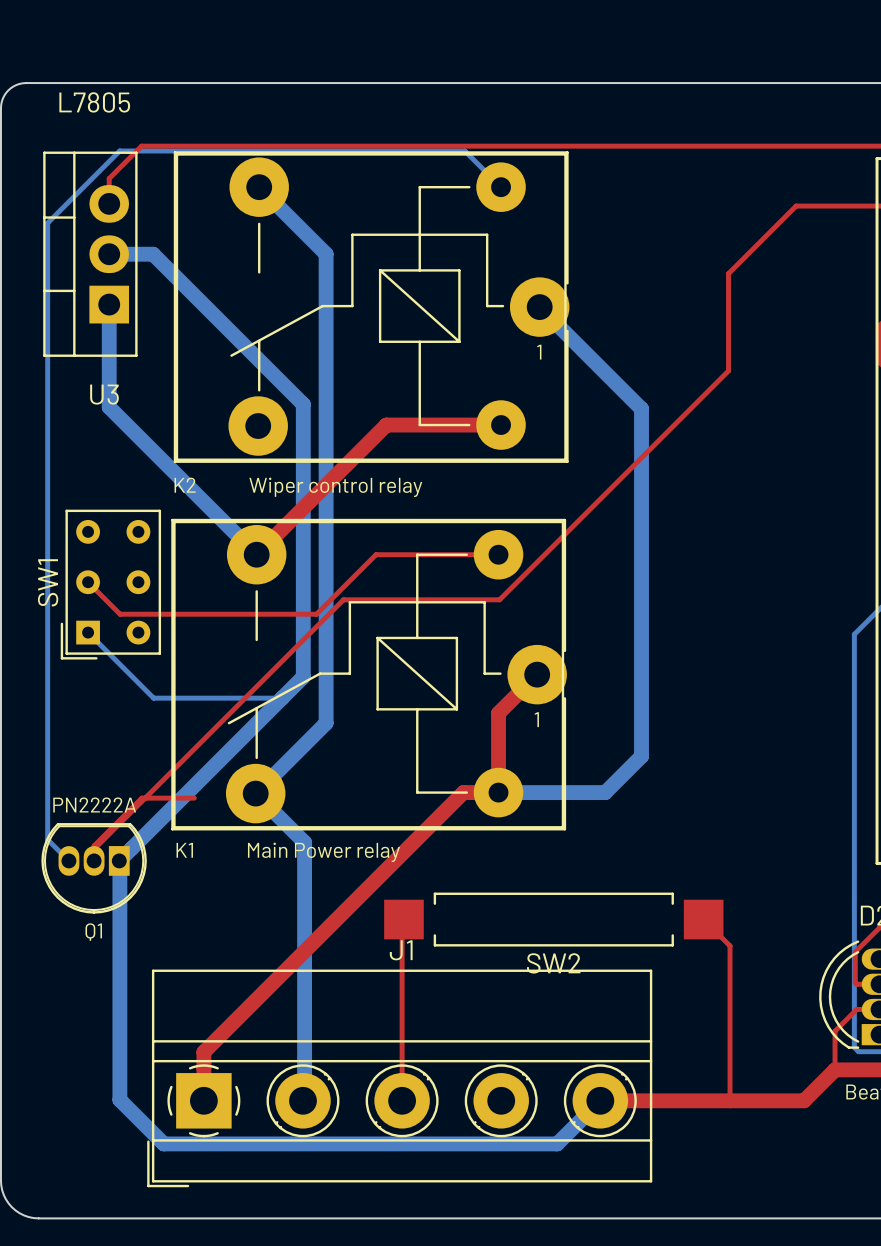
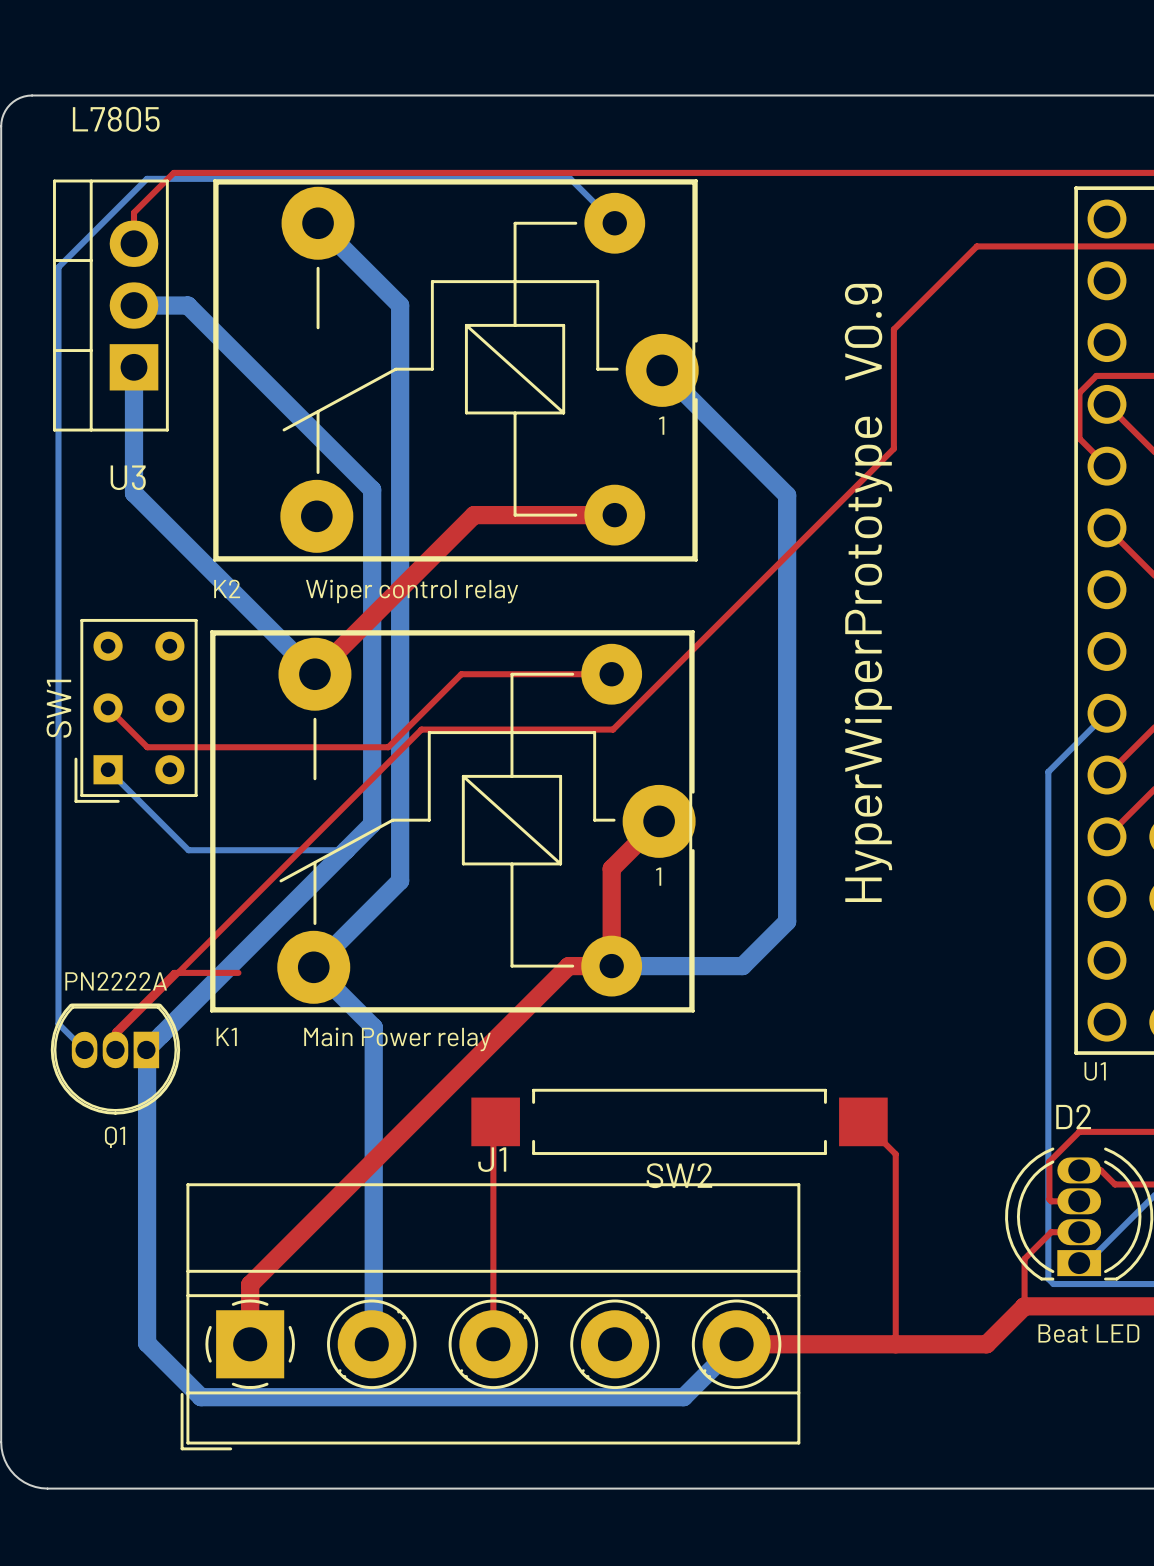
text: none -> HyperWiperPrototype V0.9 (868, 592)

